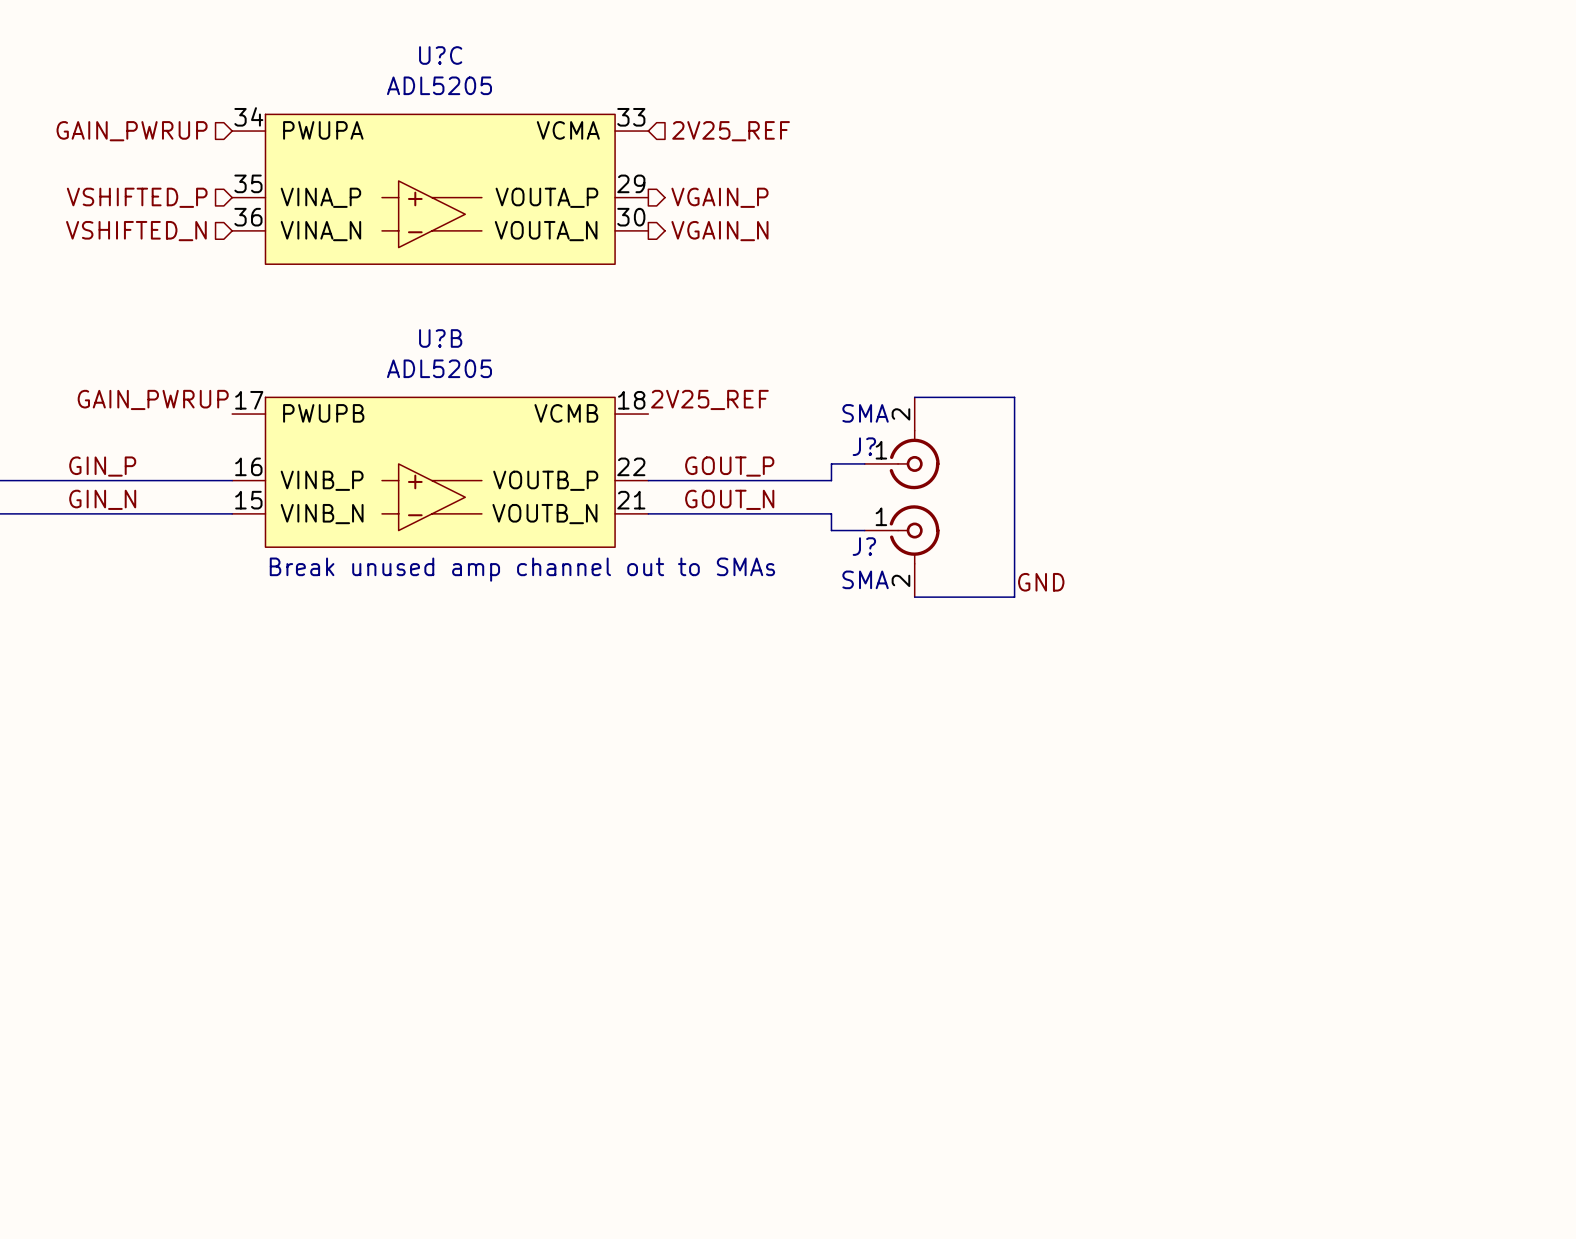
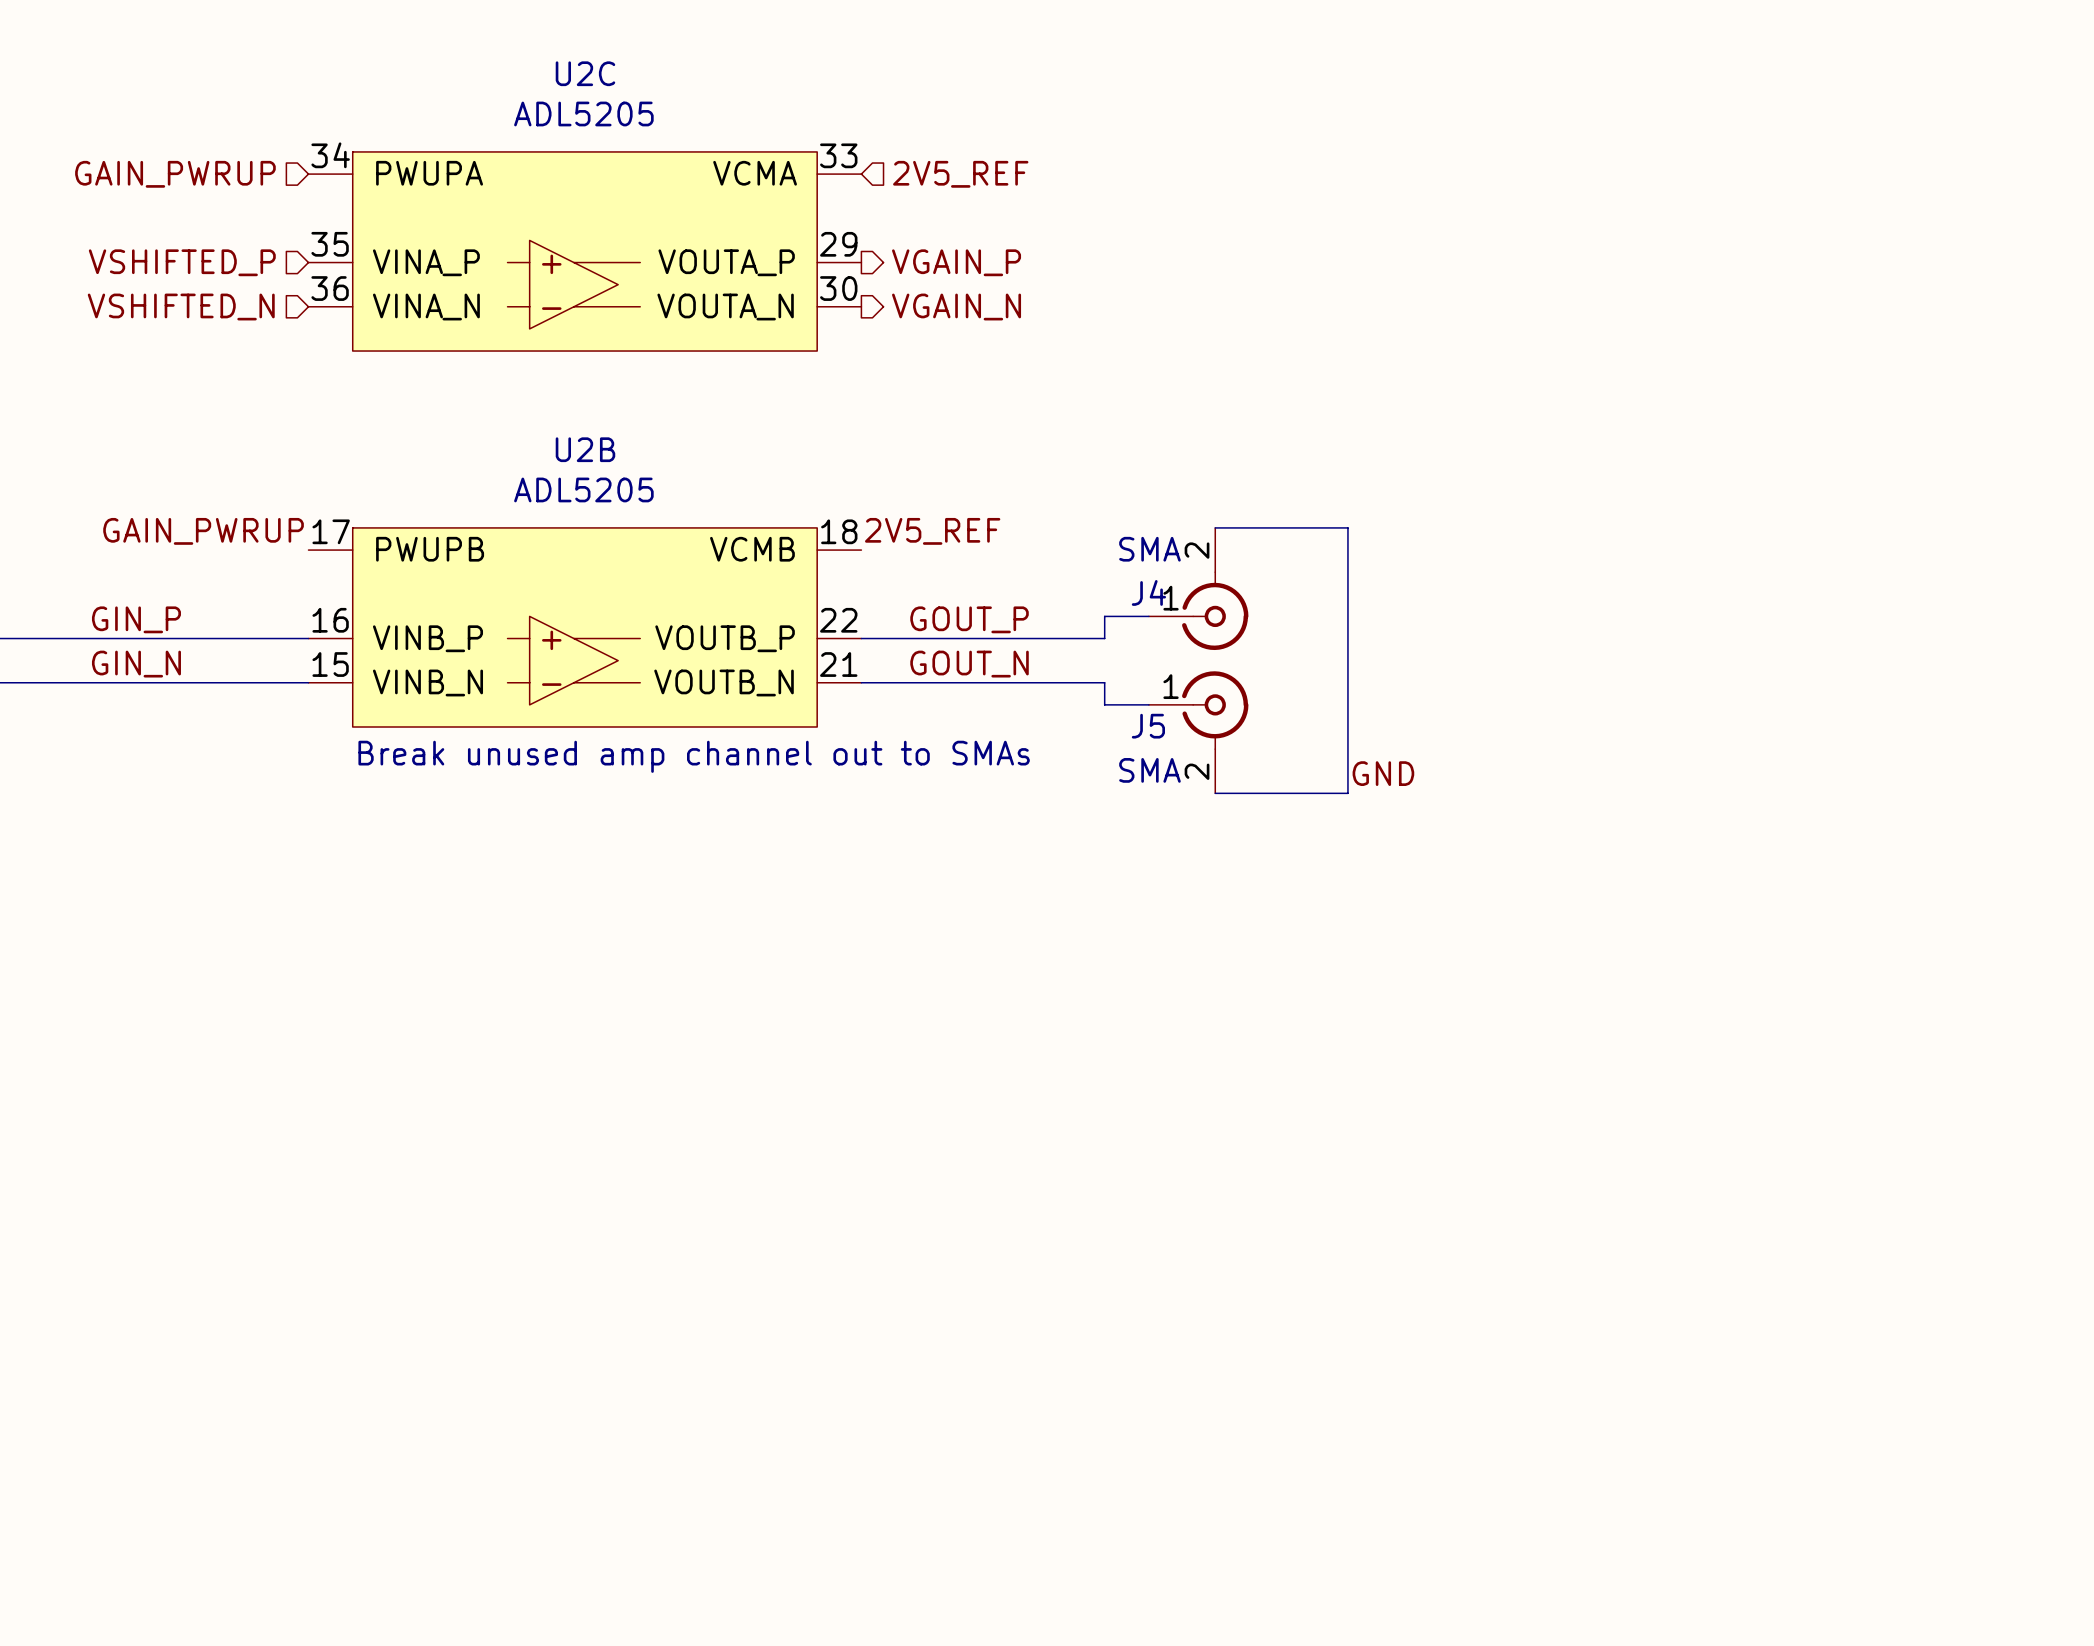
U?C name: U?C (440, 55) -> U2C (585, 73)
hierarchical label: 2V25_REF (731, 131) -> 2V5_REF (960, 174)
U?B name: U?B (440, 338) -> U2B (585, 449)
label: 2V25_REF (709, 399) -> 2V5_REF (932, 531)
J? name: J? (864, 446) -> J4 (1148, 592)
J? name: J? (864, 546) -> J5 (1148, 726)

